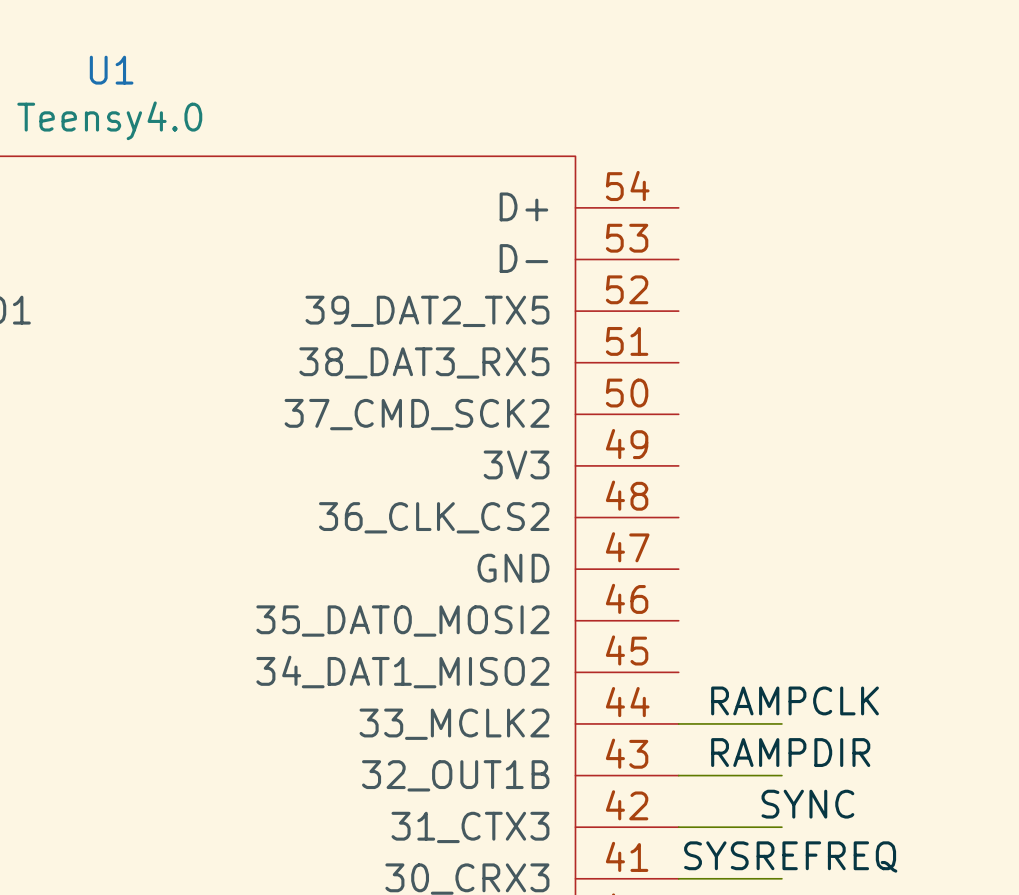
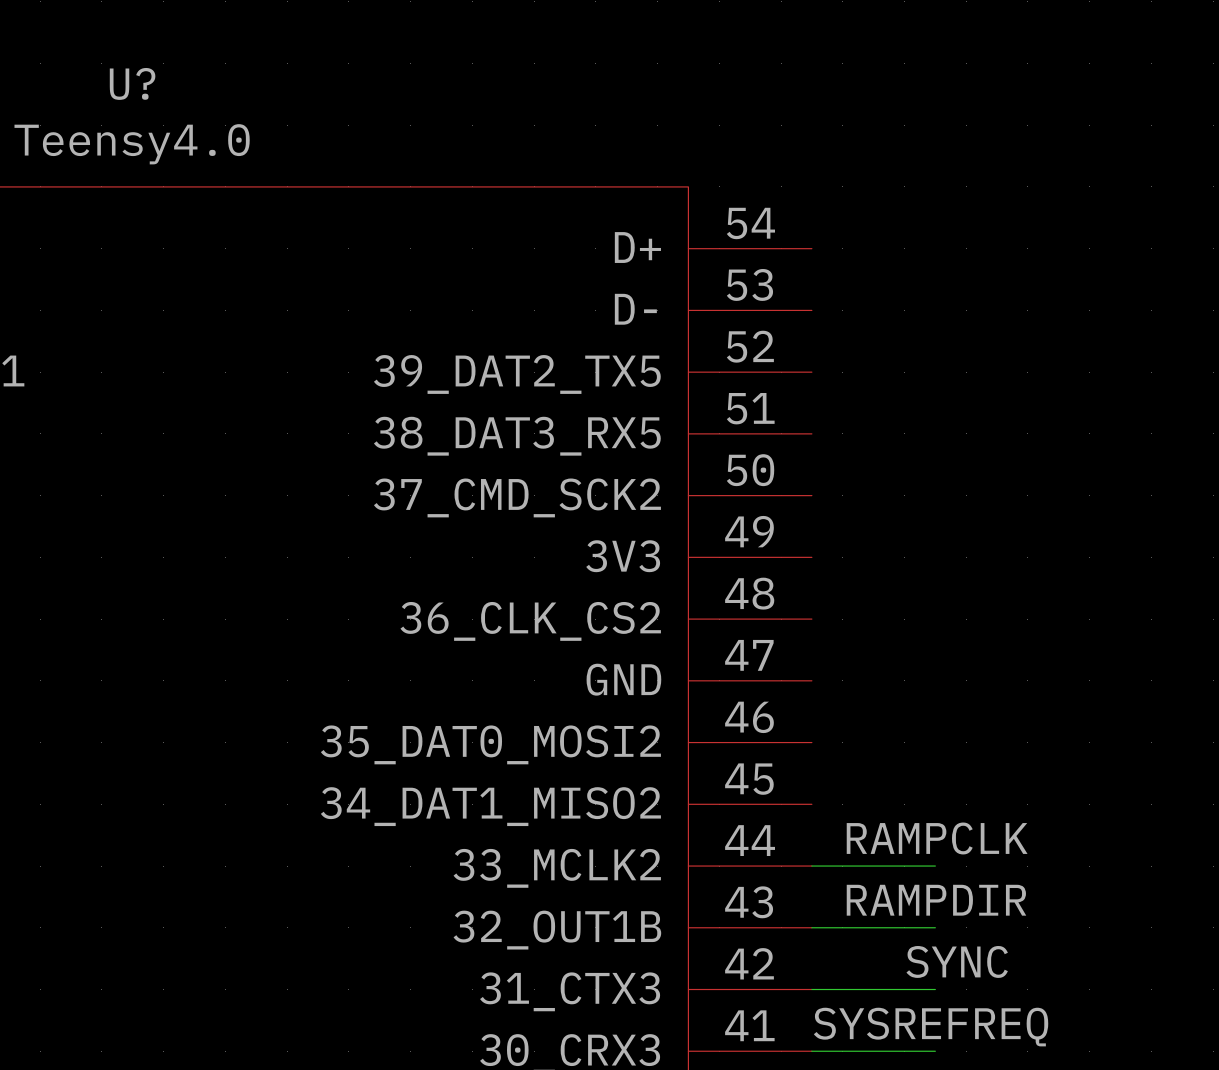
U1 name: U1 (111, 70) -> U? (132, 83)

